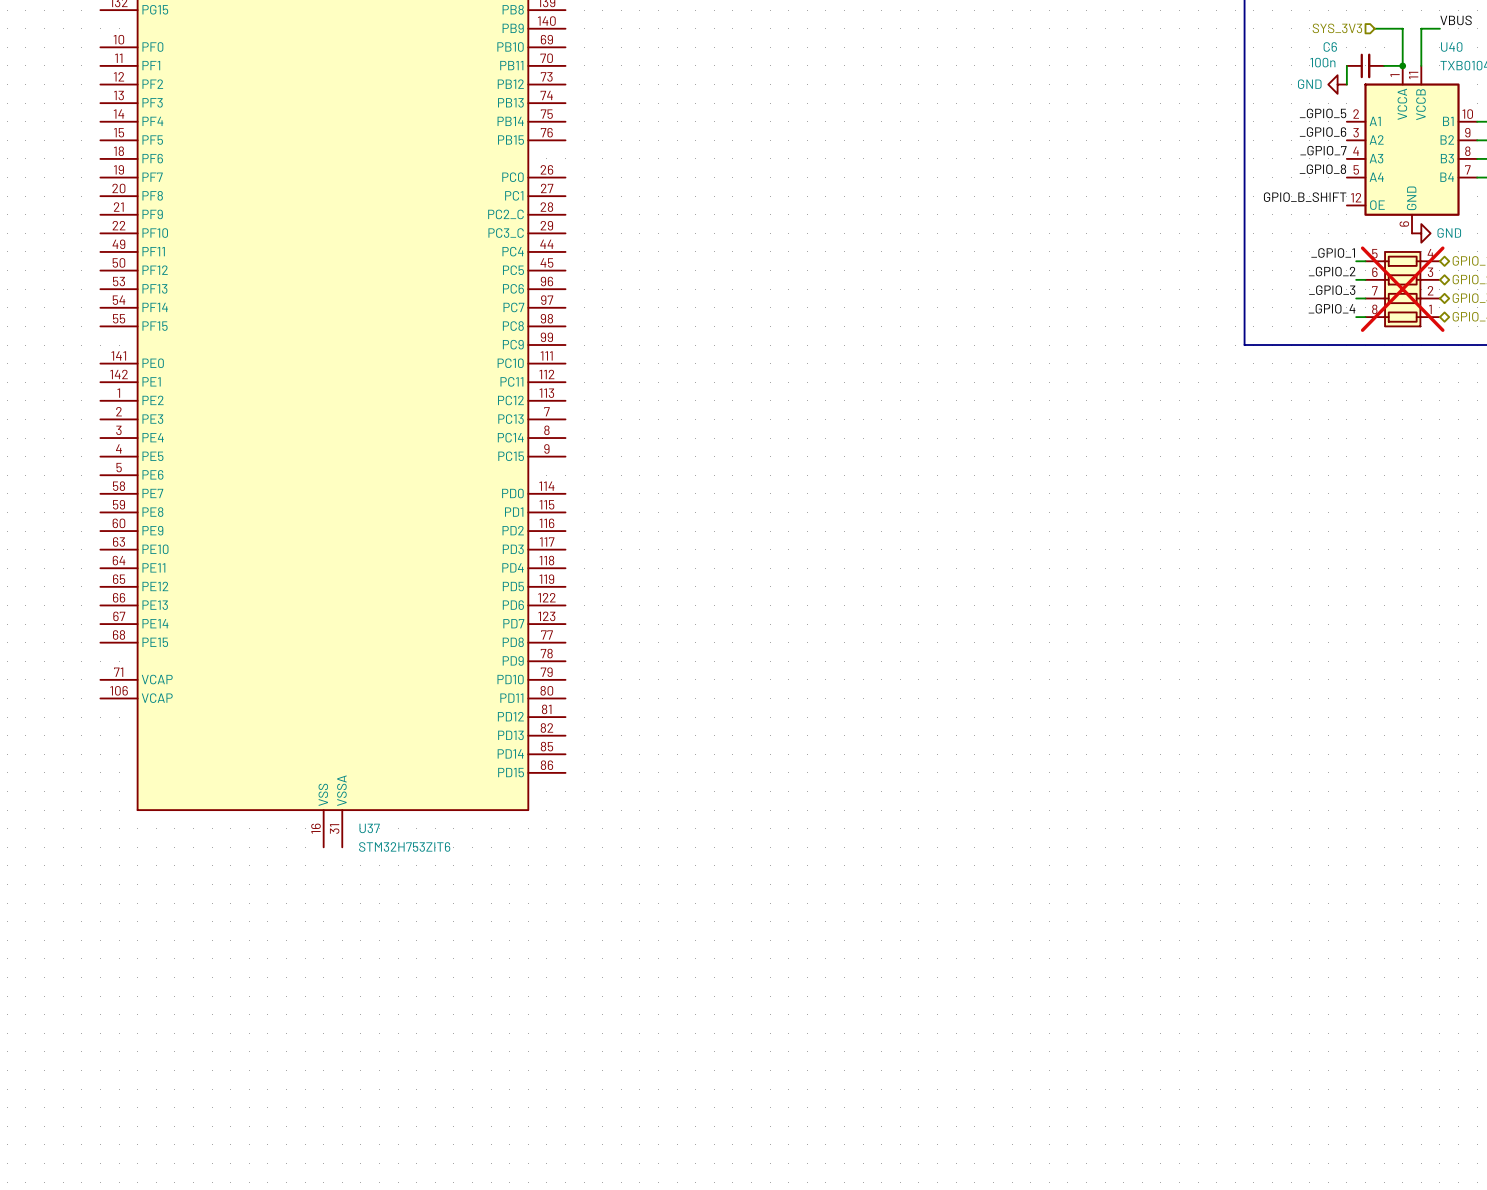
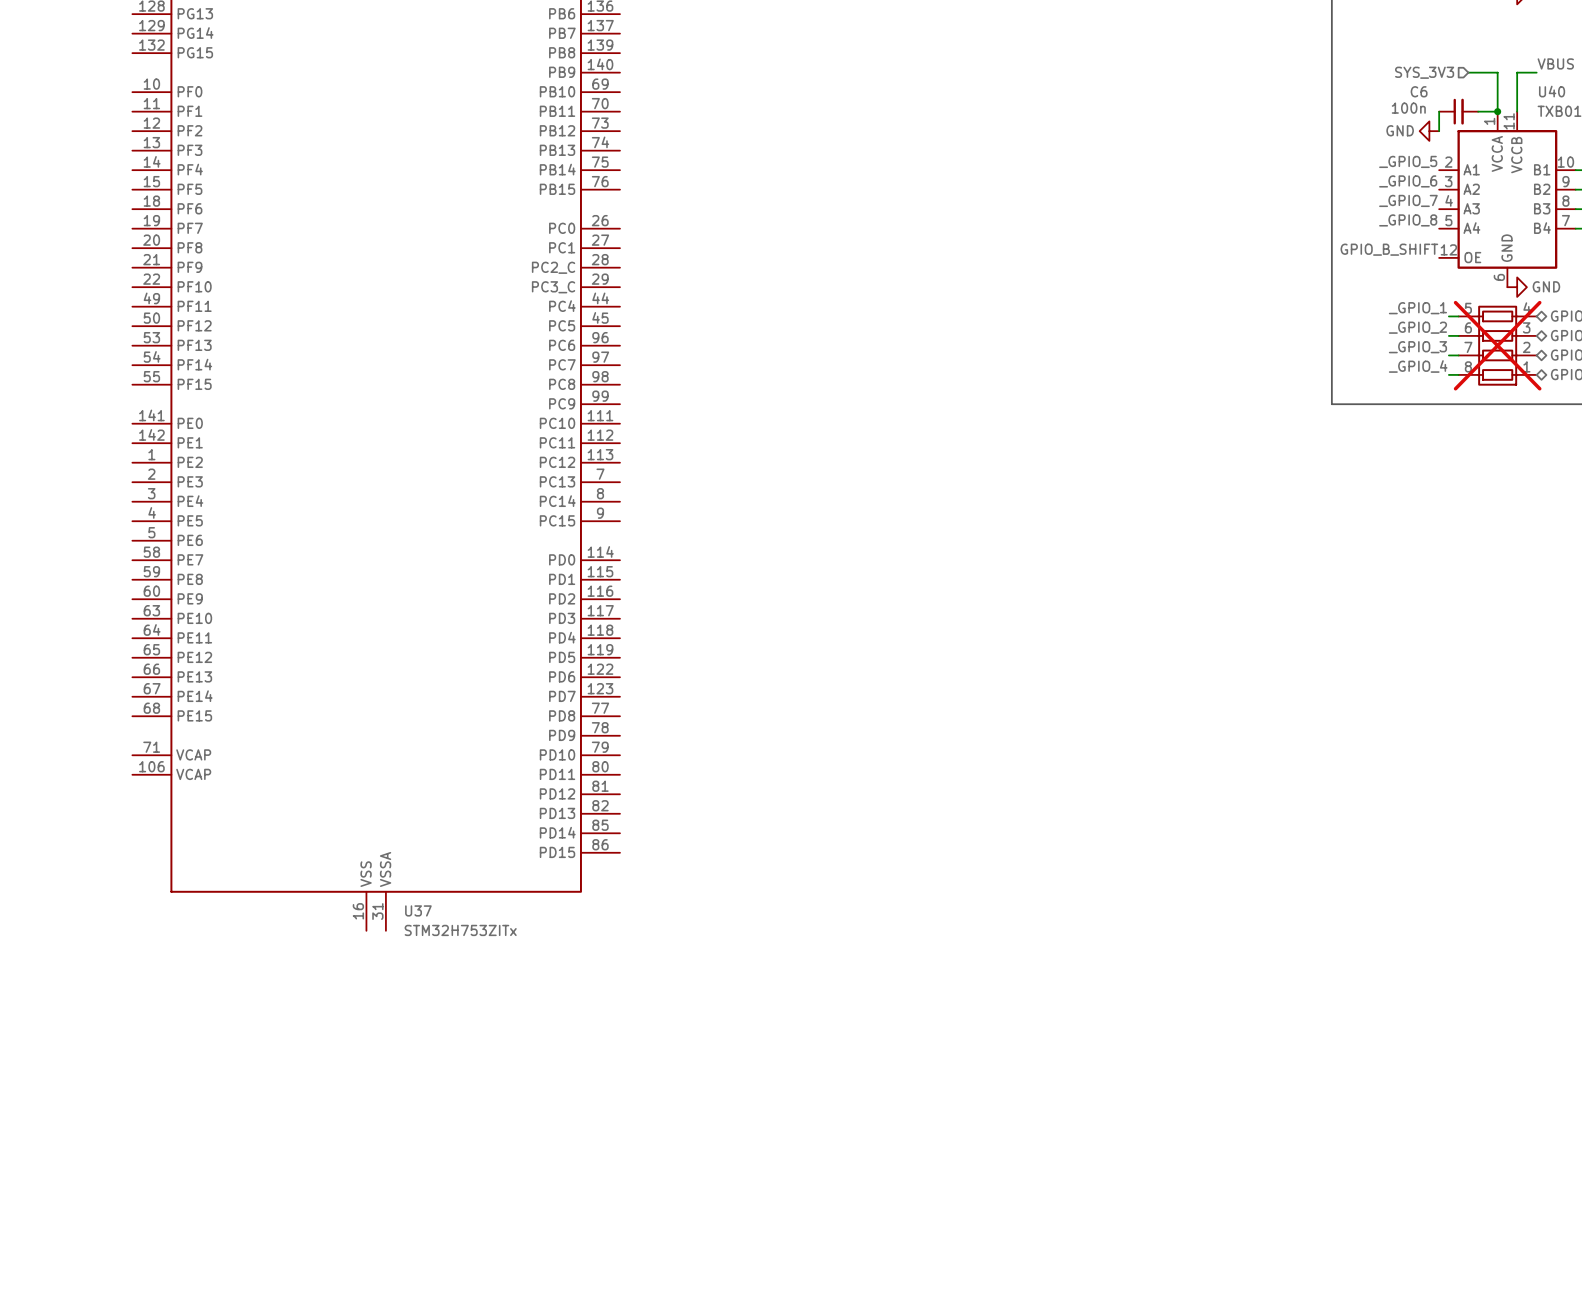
U37 value: STM32H753ZIT6 (404, 846) -> STM32H753ZITx (460, 930)

